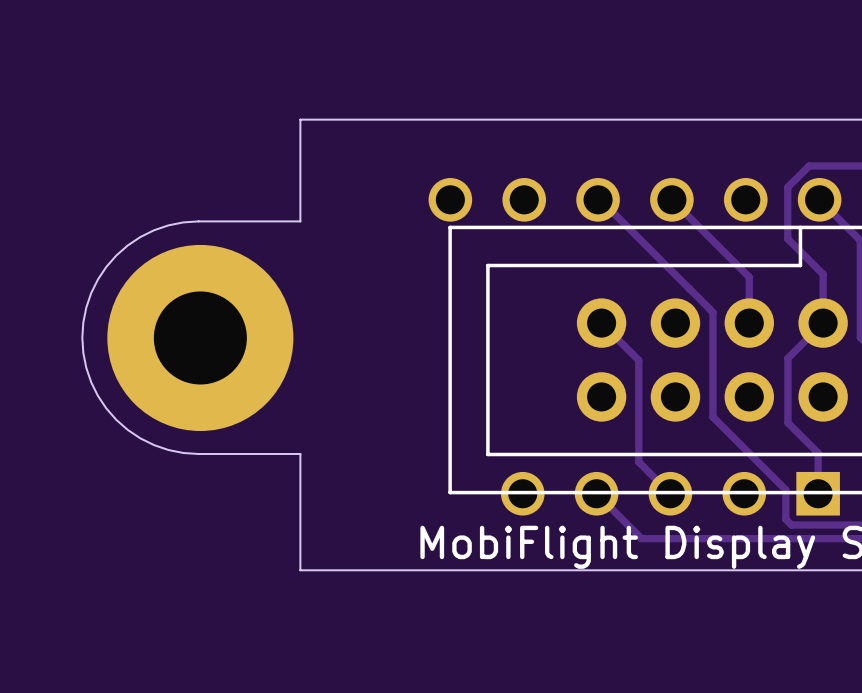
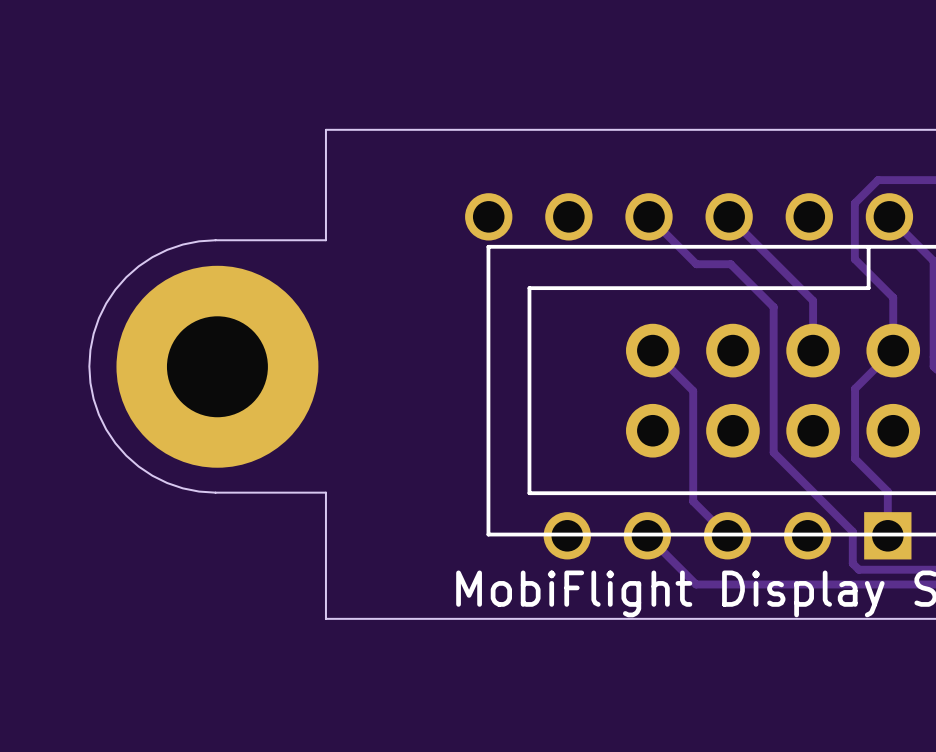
track: (598, 199) (600, 199) (712, 312) -> (649, 216) (696, 264) (730, 264) (773, 307) (773, 339)

